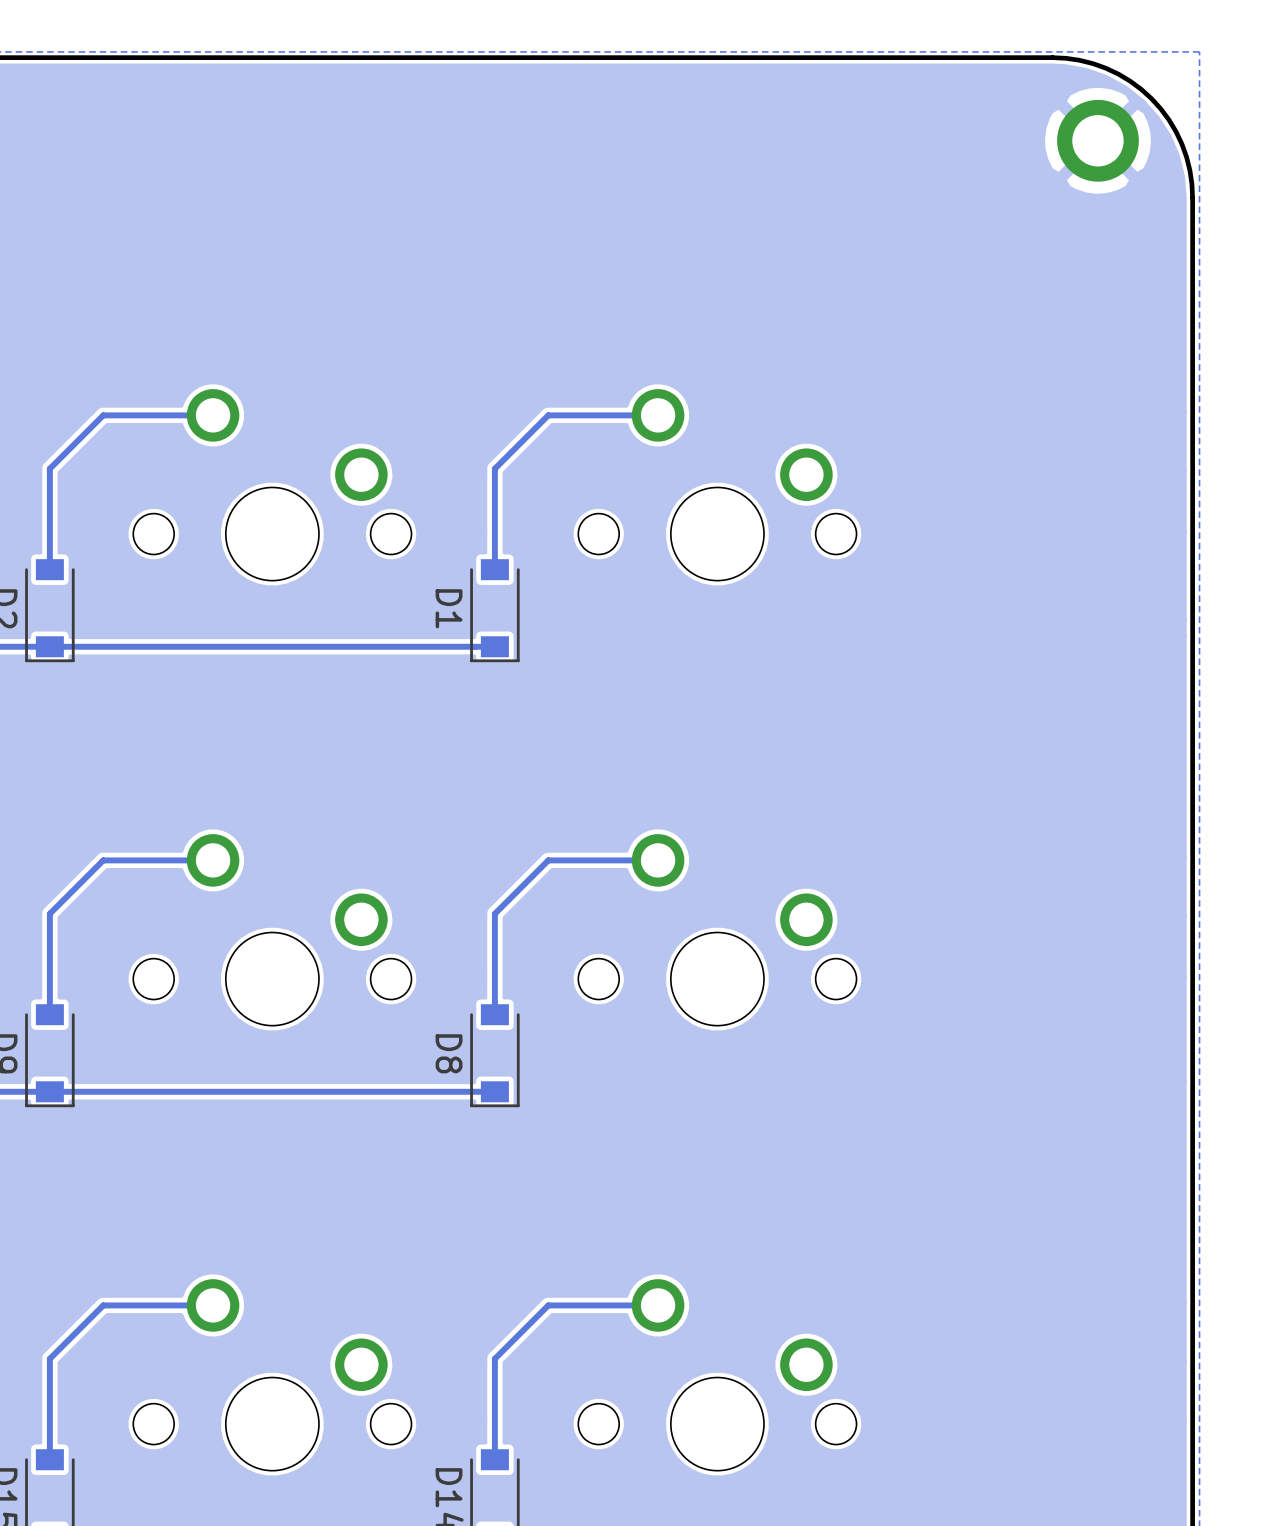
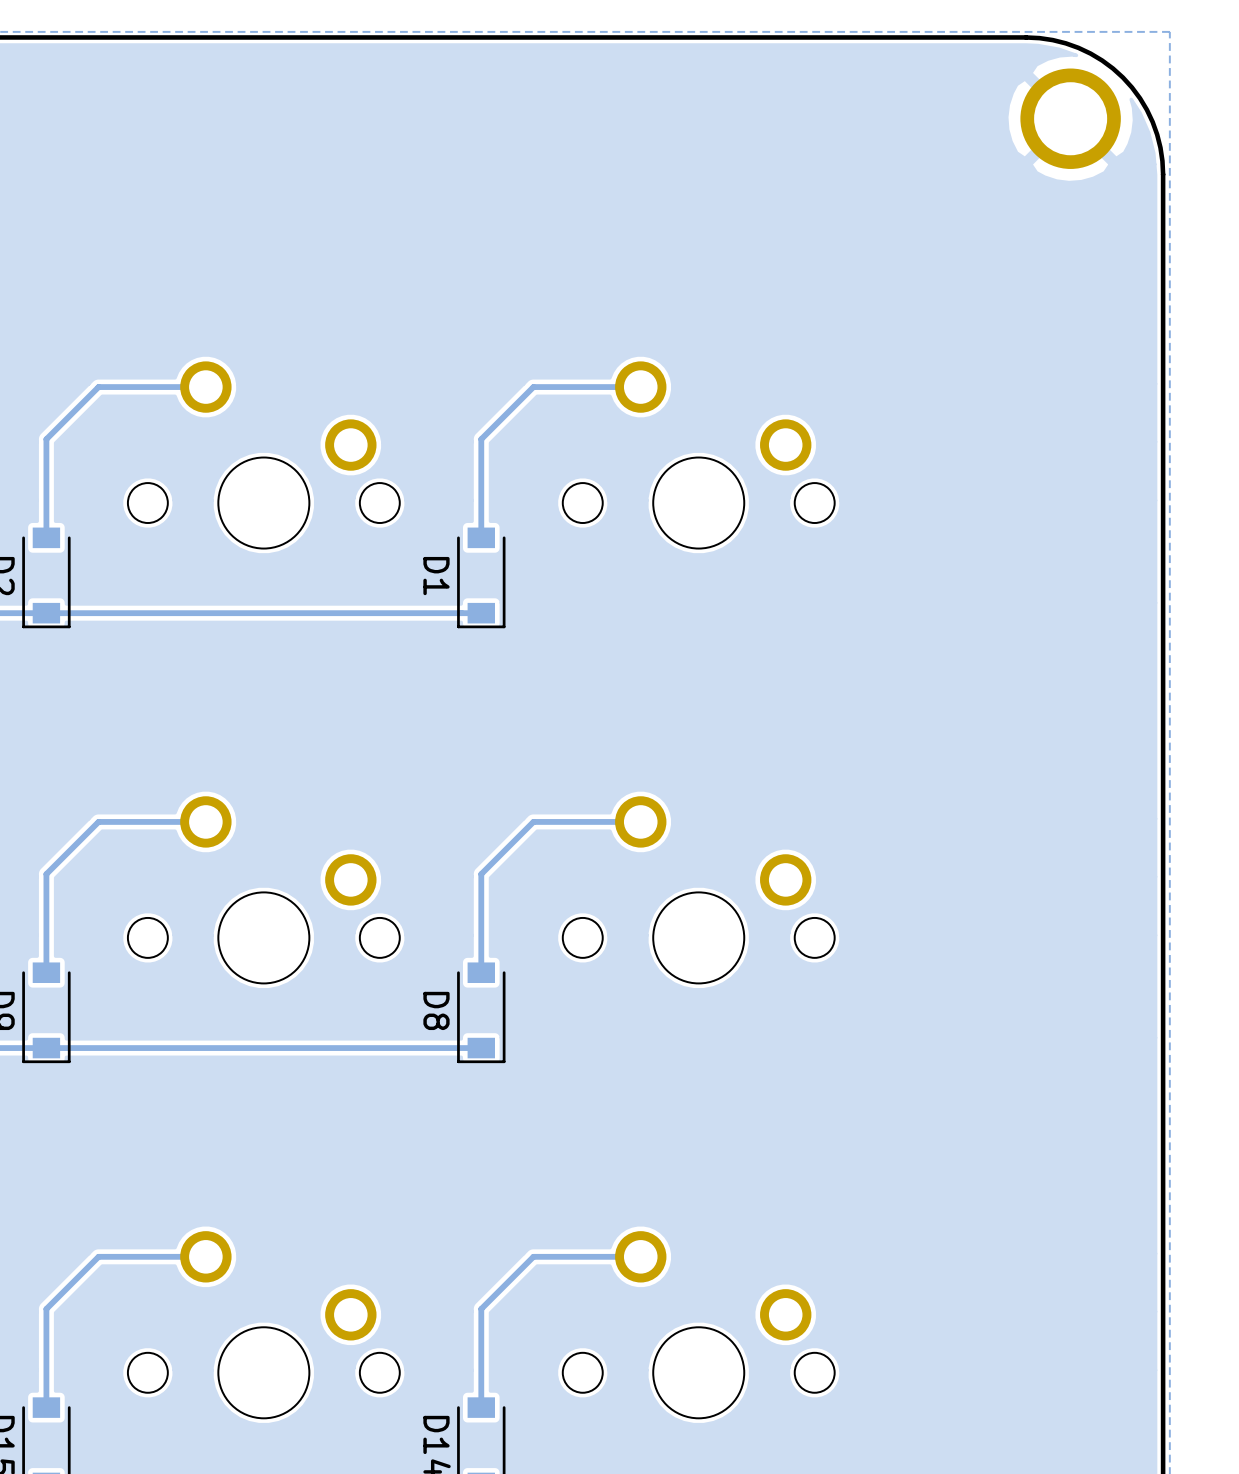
part footprint: [1057, 99, 1139, 182] -> [1020, 68, 1121, 169]

